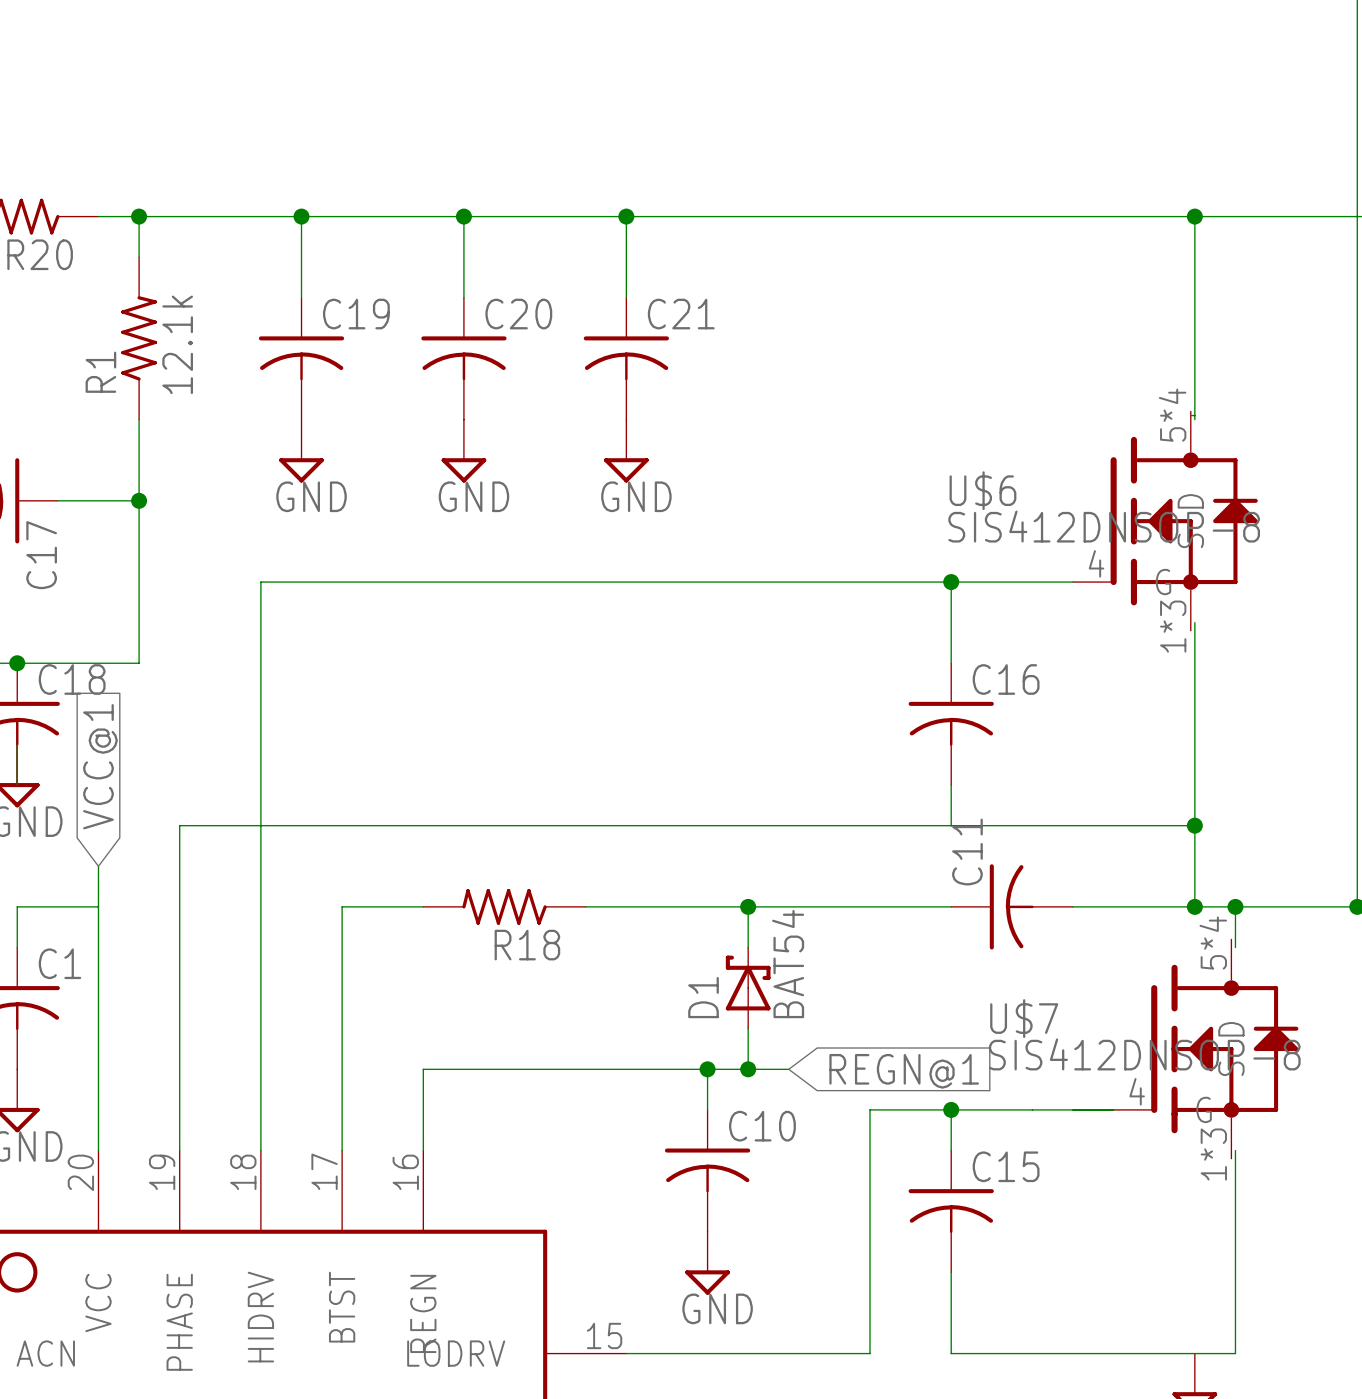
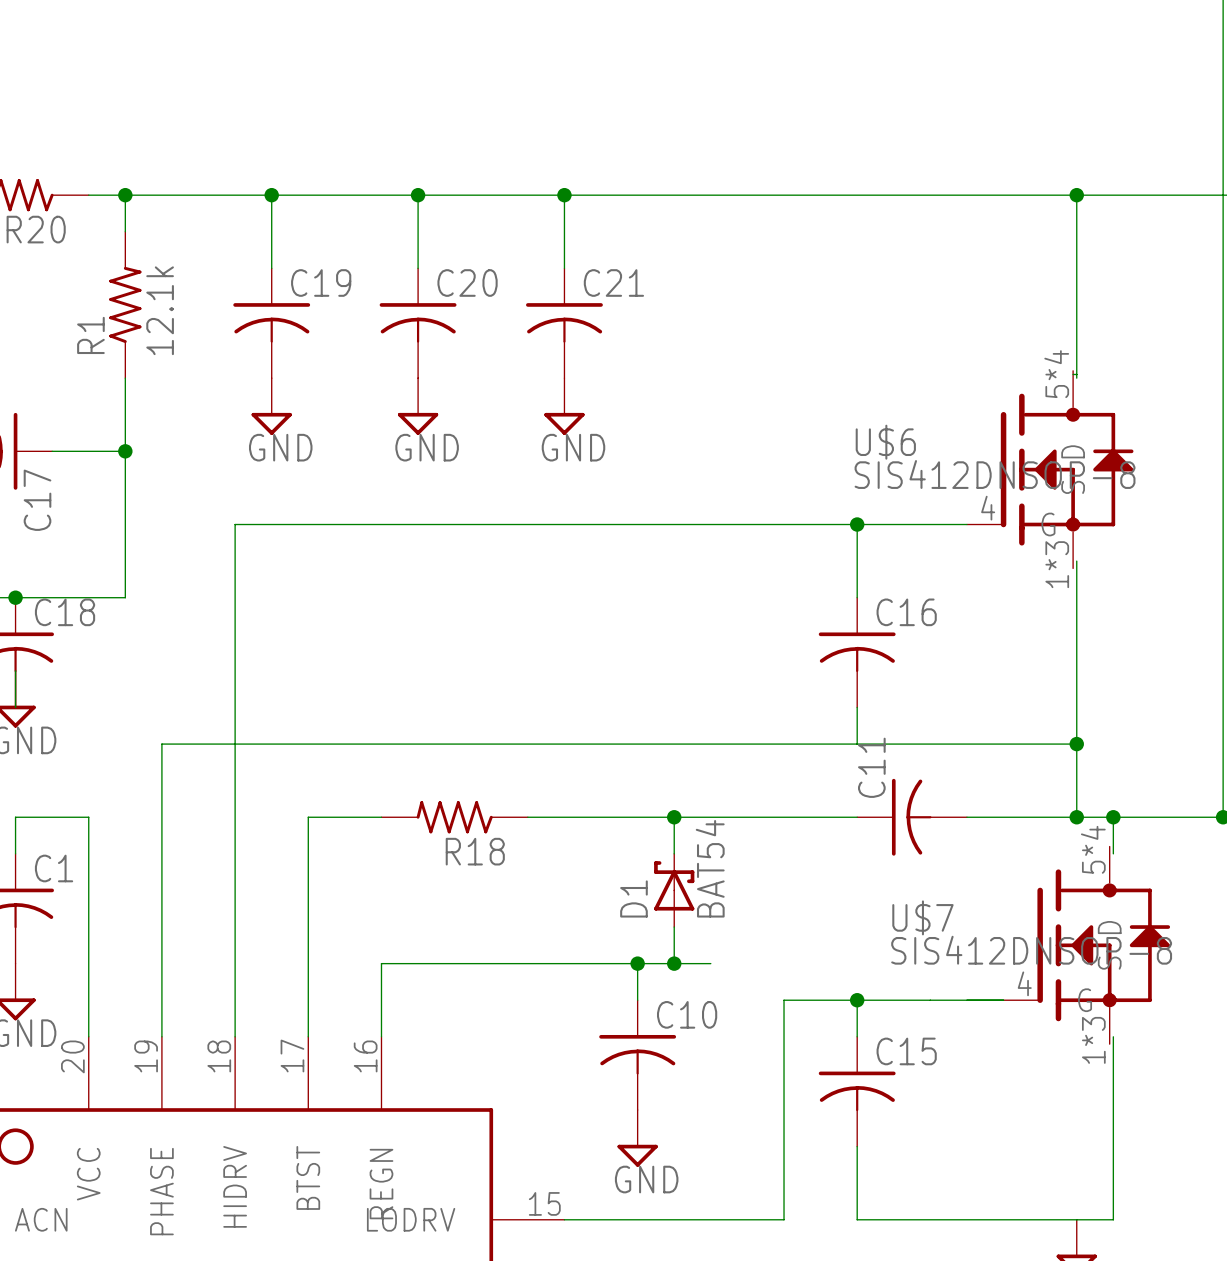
global label: VCC@1 (100, 766) -> none
wire: (98, 866) (98, 906) -> none
global label: REGN@1 (904, 1071) -> none

